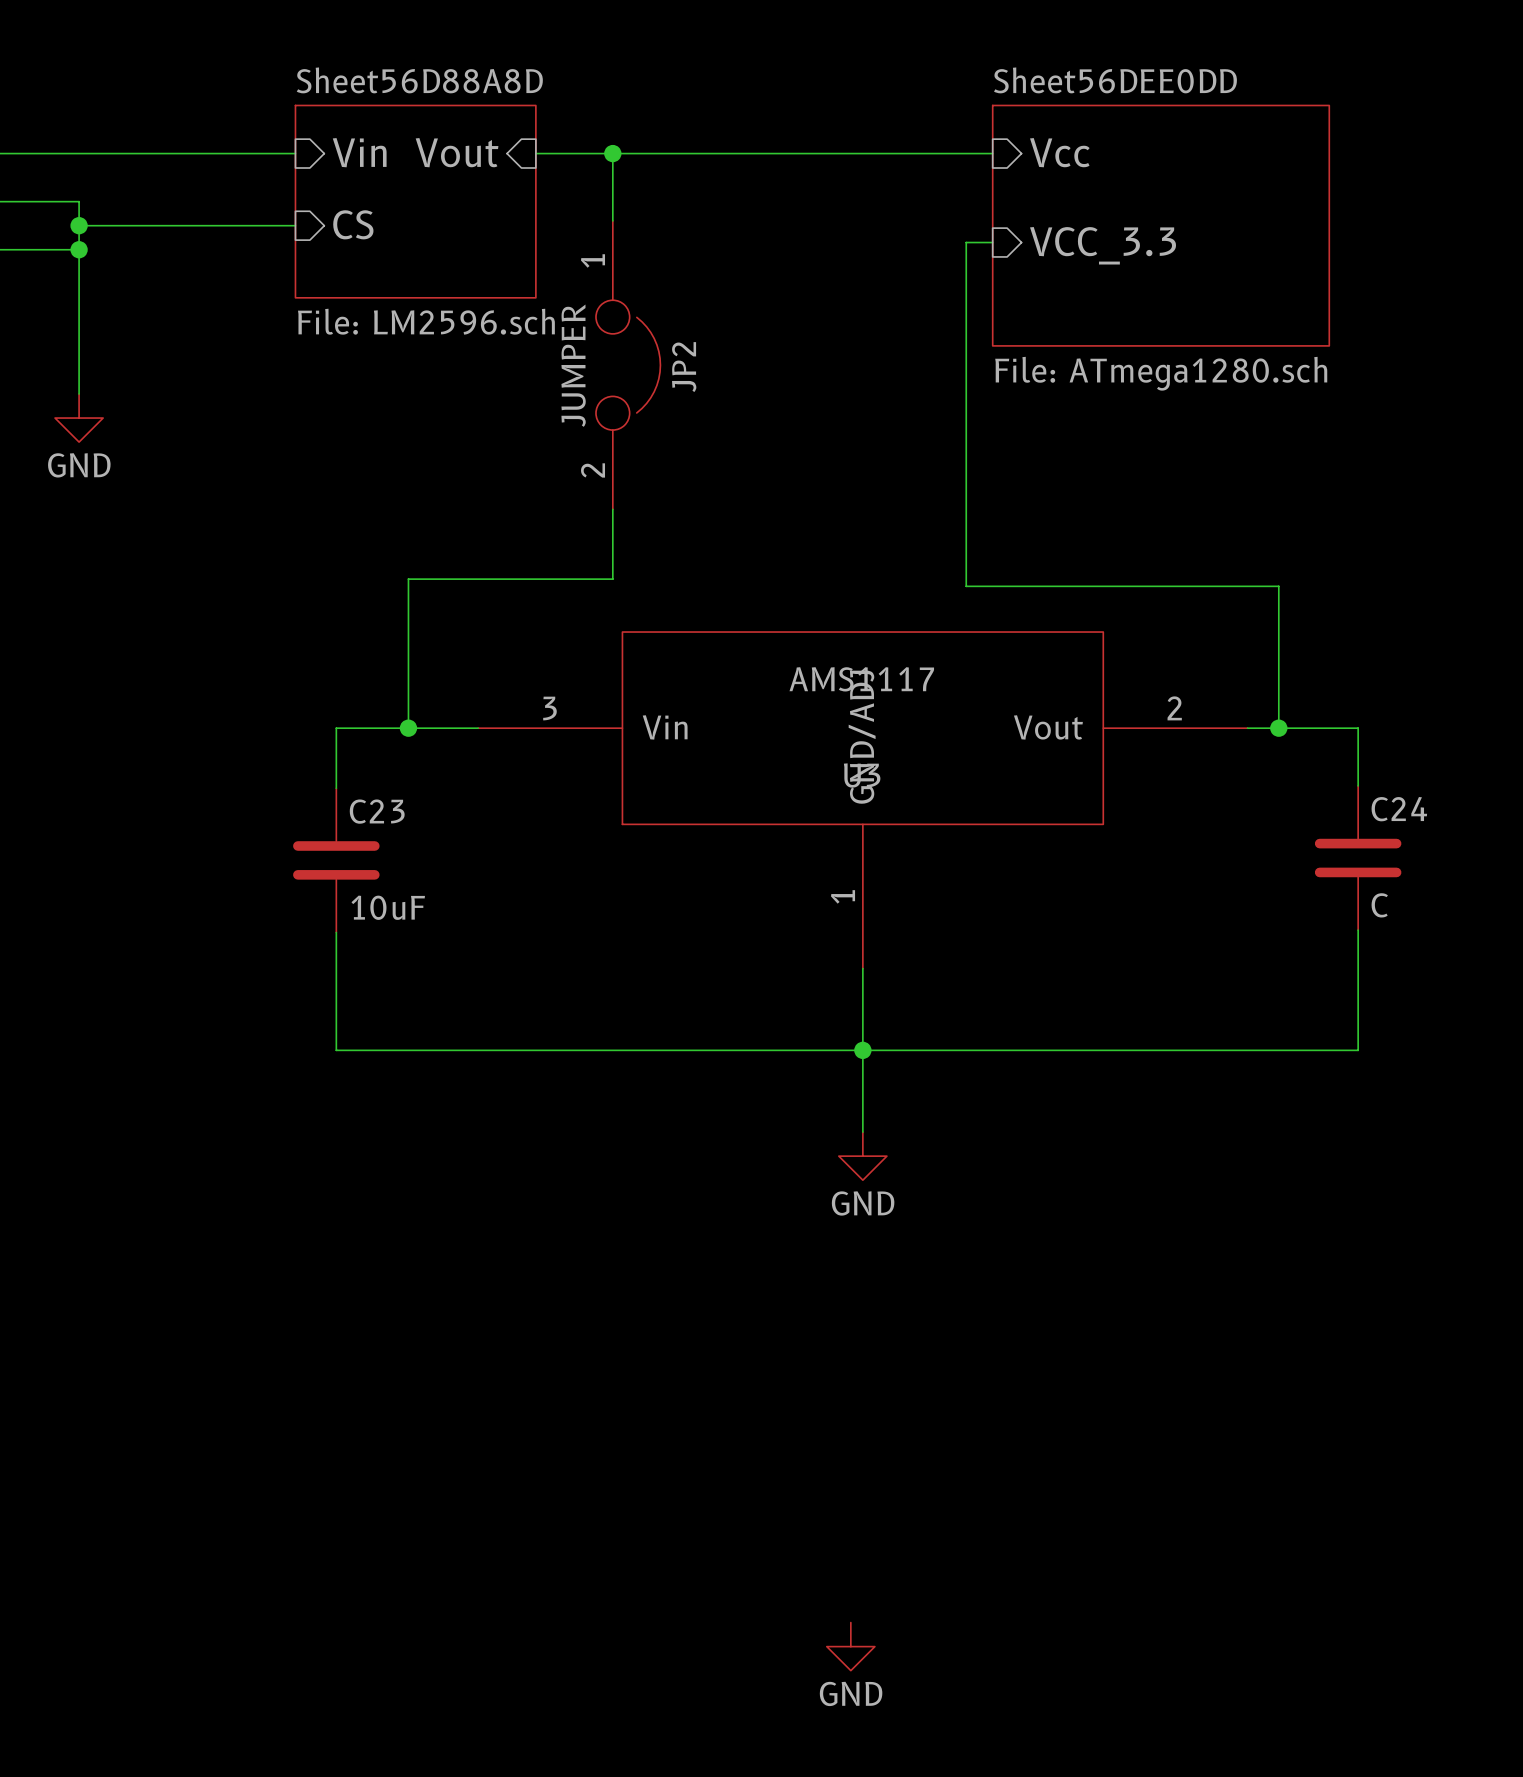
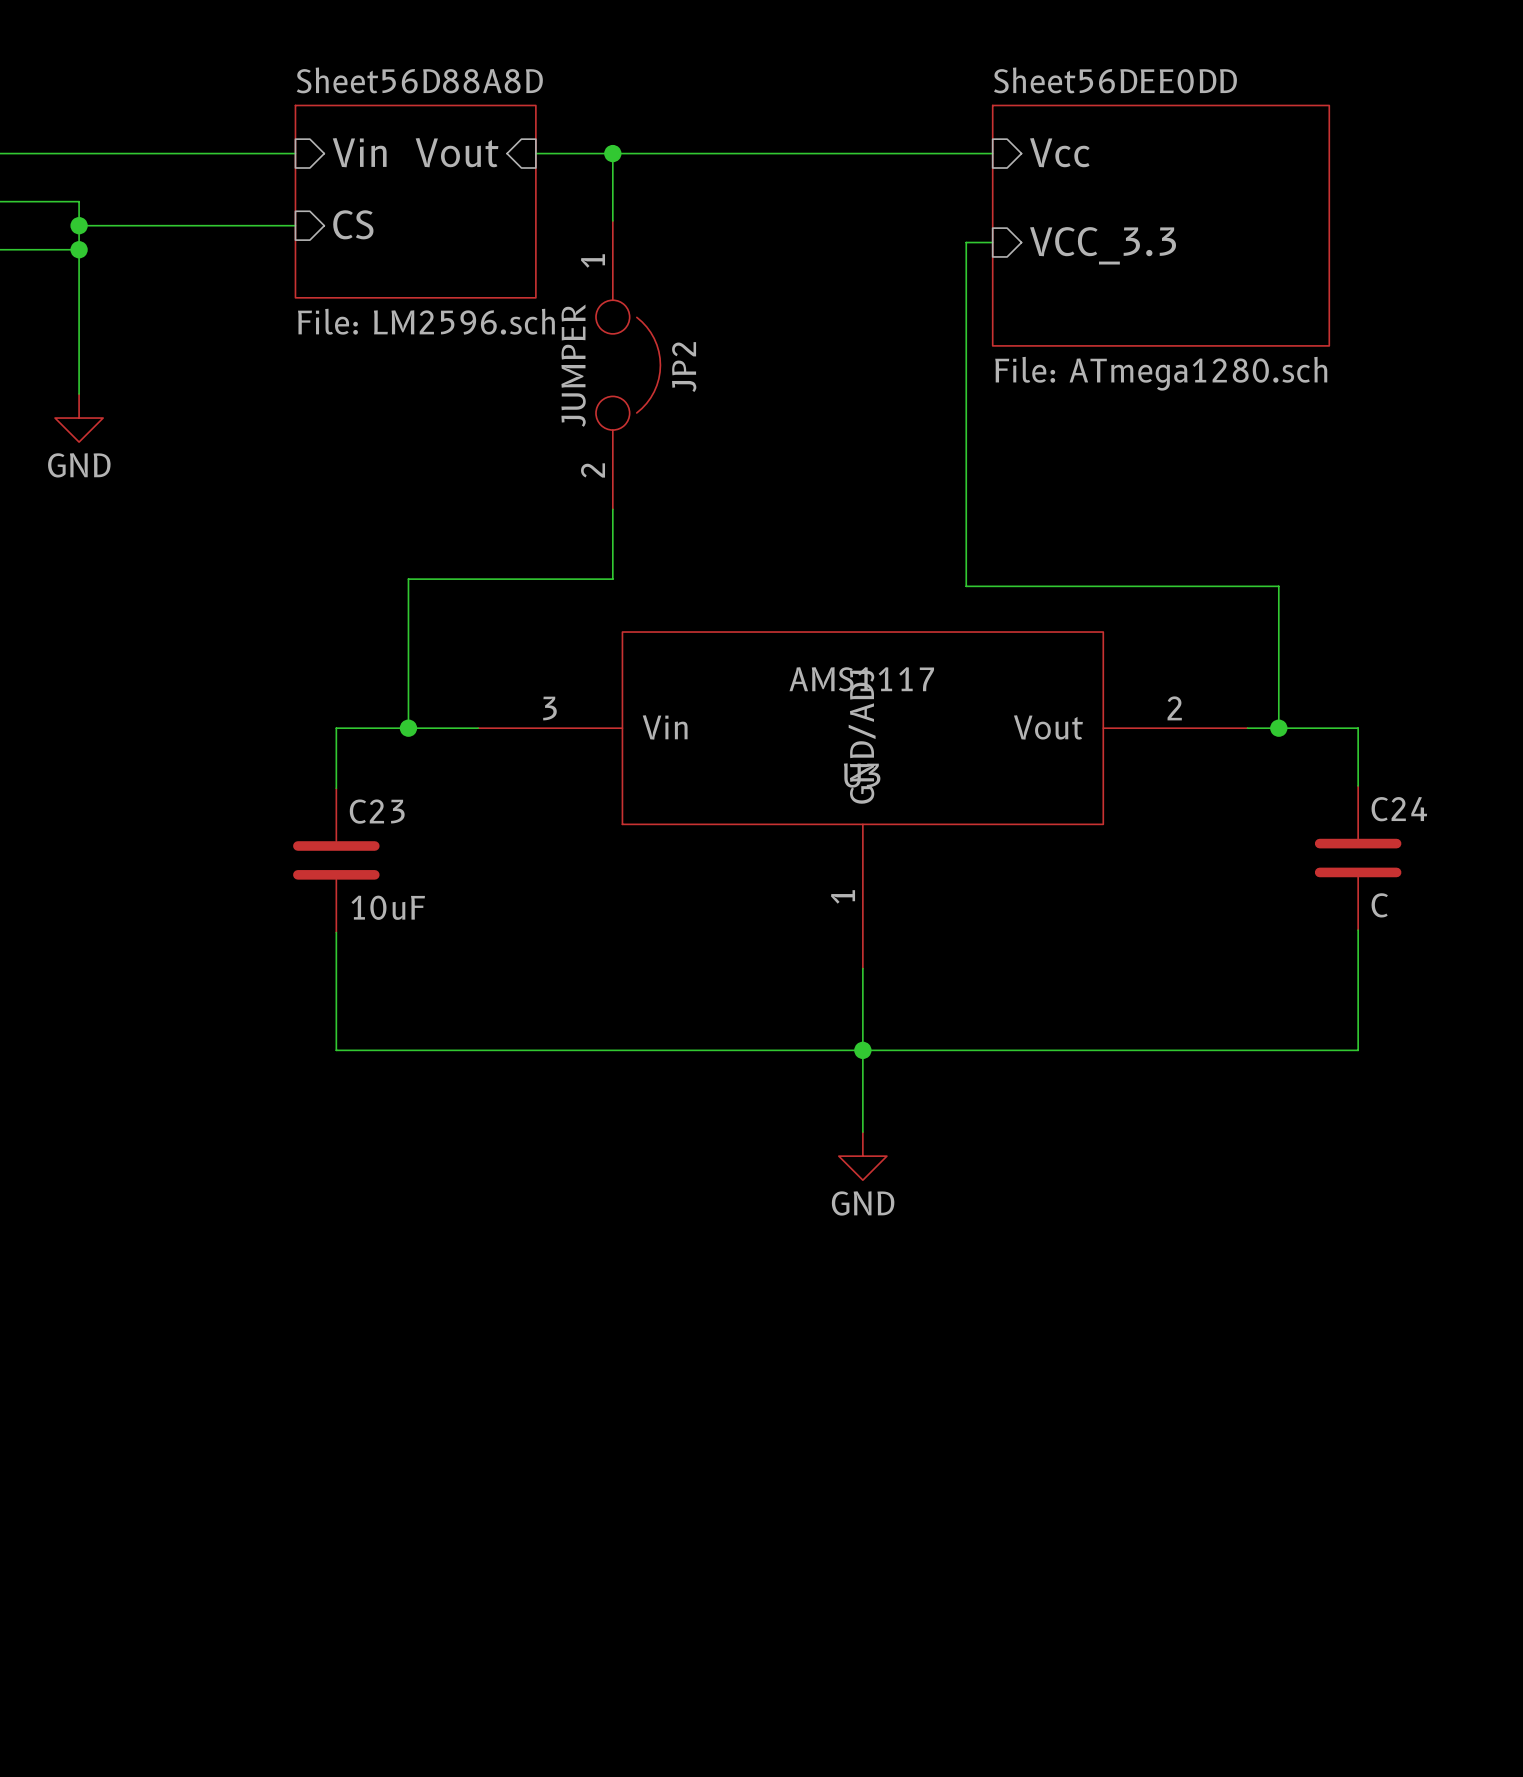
power symbol: GND (850, 1646) -> none

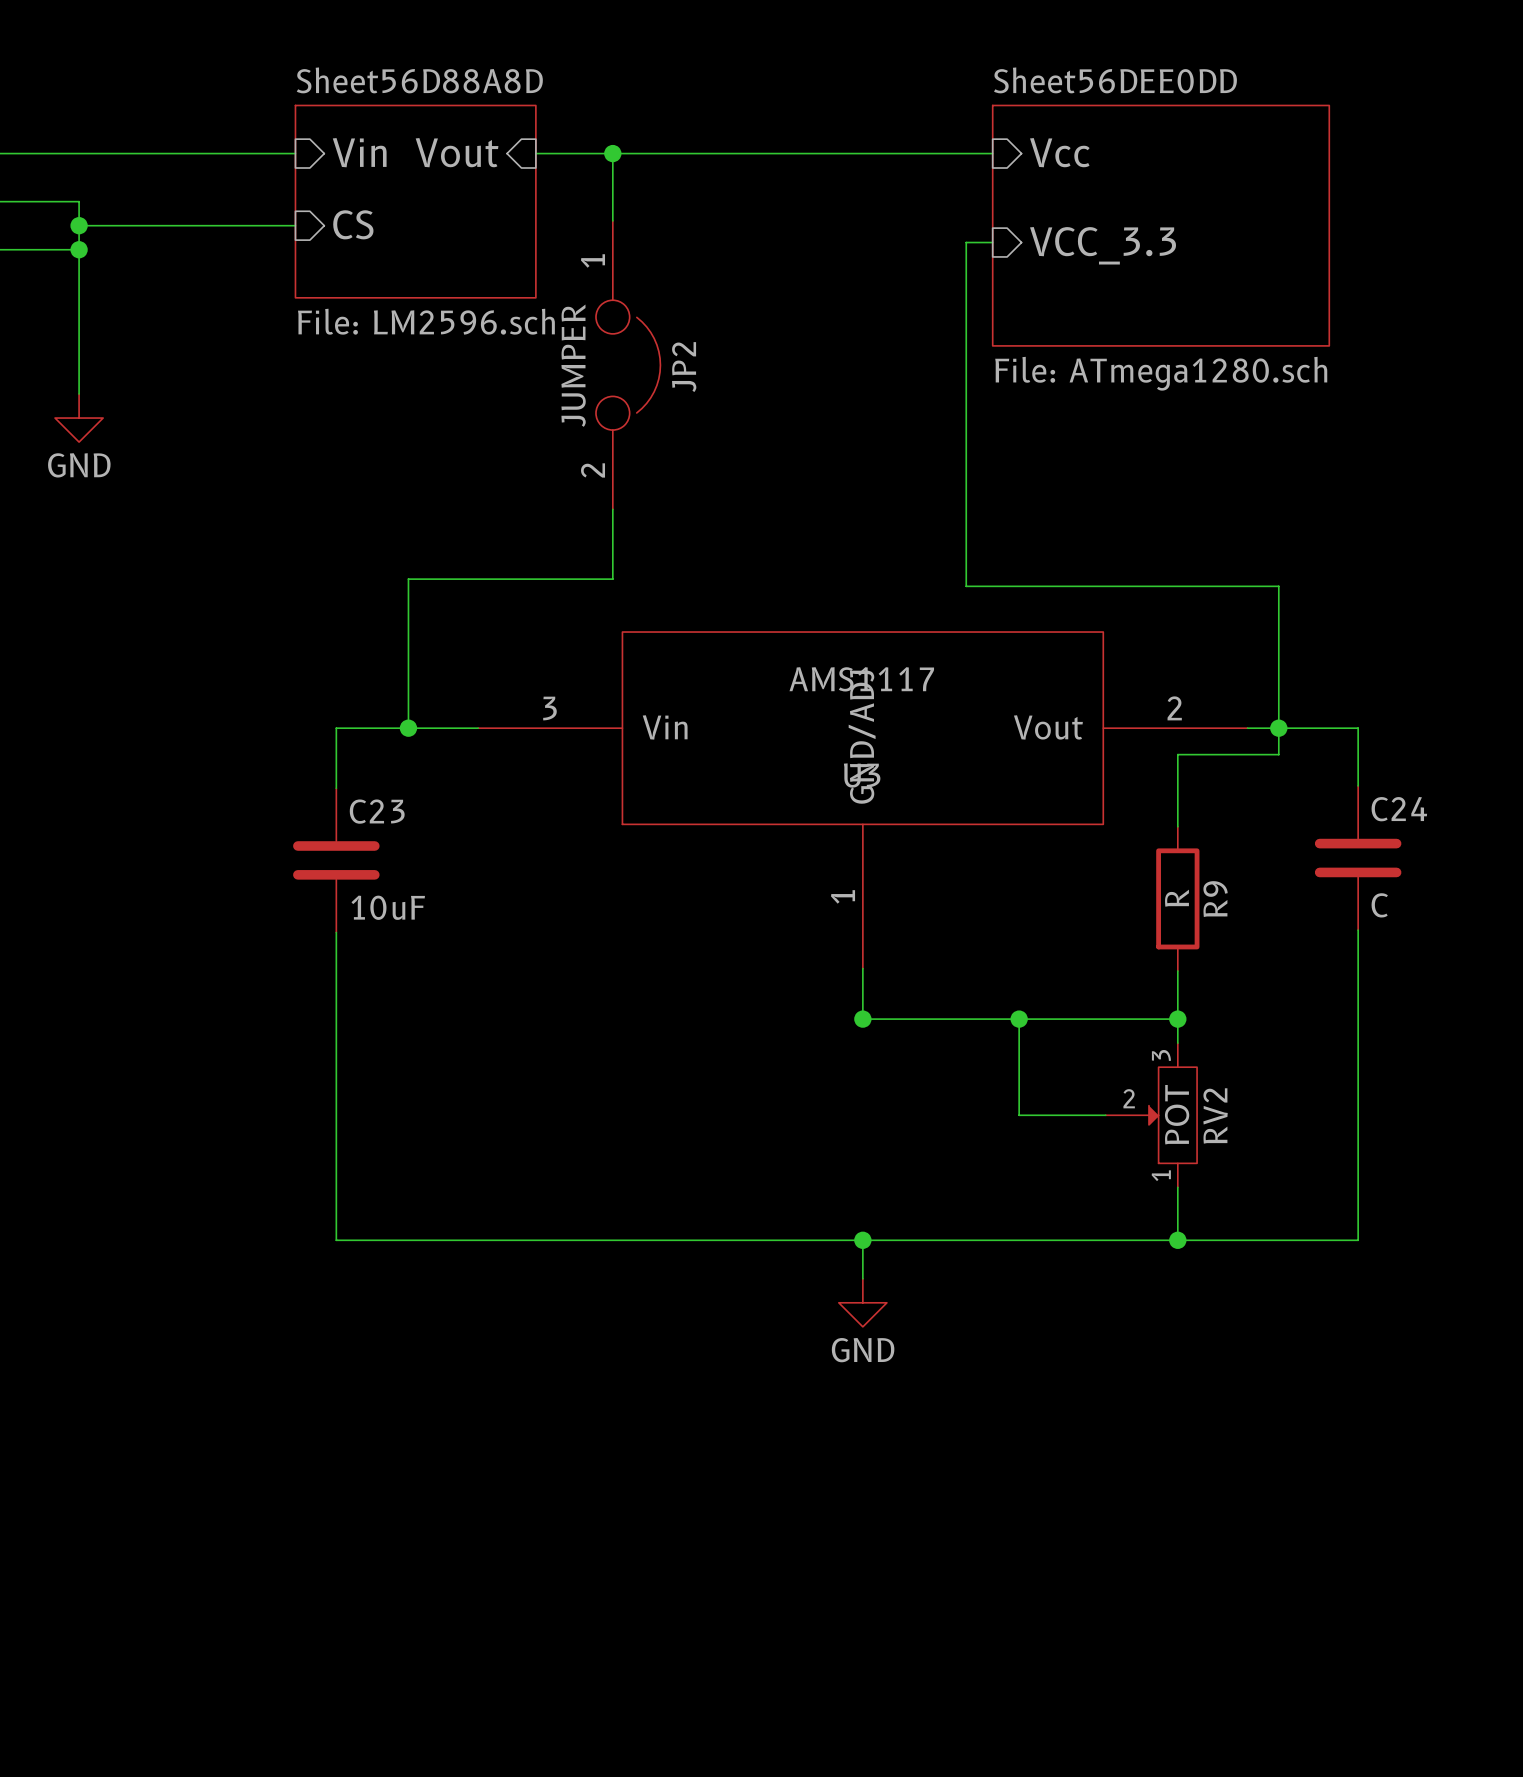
wire: none -> (1278, 728) (1278, 754) (1177, 754) (1177, 826)
R9: none -> R (1177, 898)
wire: none -> (1177, 971) (1177, 1043)
wire: (862, 1019) (862, 1132) -> (862, 1019) (1177, 1019)
wire: none -> (1019, 1019) (1019, 1115) (1105, 1115)
junction: none -> (1019, 1019)
junction: none -> (1177, 1019)
wire: (336, 1050) (1358, 1050) -> (336, 1050) (336, 1240) (1358, 1240) (1358, 1050)
junction position: (862, 1050) -> (862, 1019)
RV2: none -> POT (1151, 1115)
power symbol position: GND (862, 1156) -> GND (862, 1302)
wire: none -> (1177, 1187) (1177, 1240)
wire: none -> (862, 1240) (862, 1278)
junction: none -> (862, 1240)
junction: none -> (1177, 1240)

